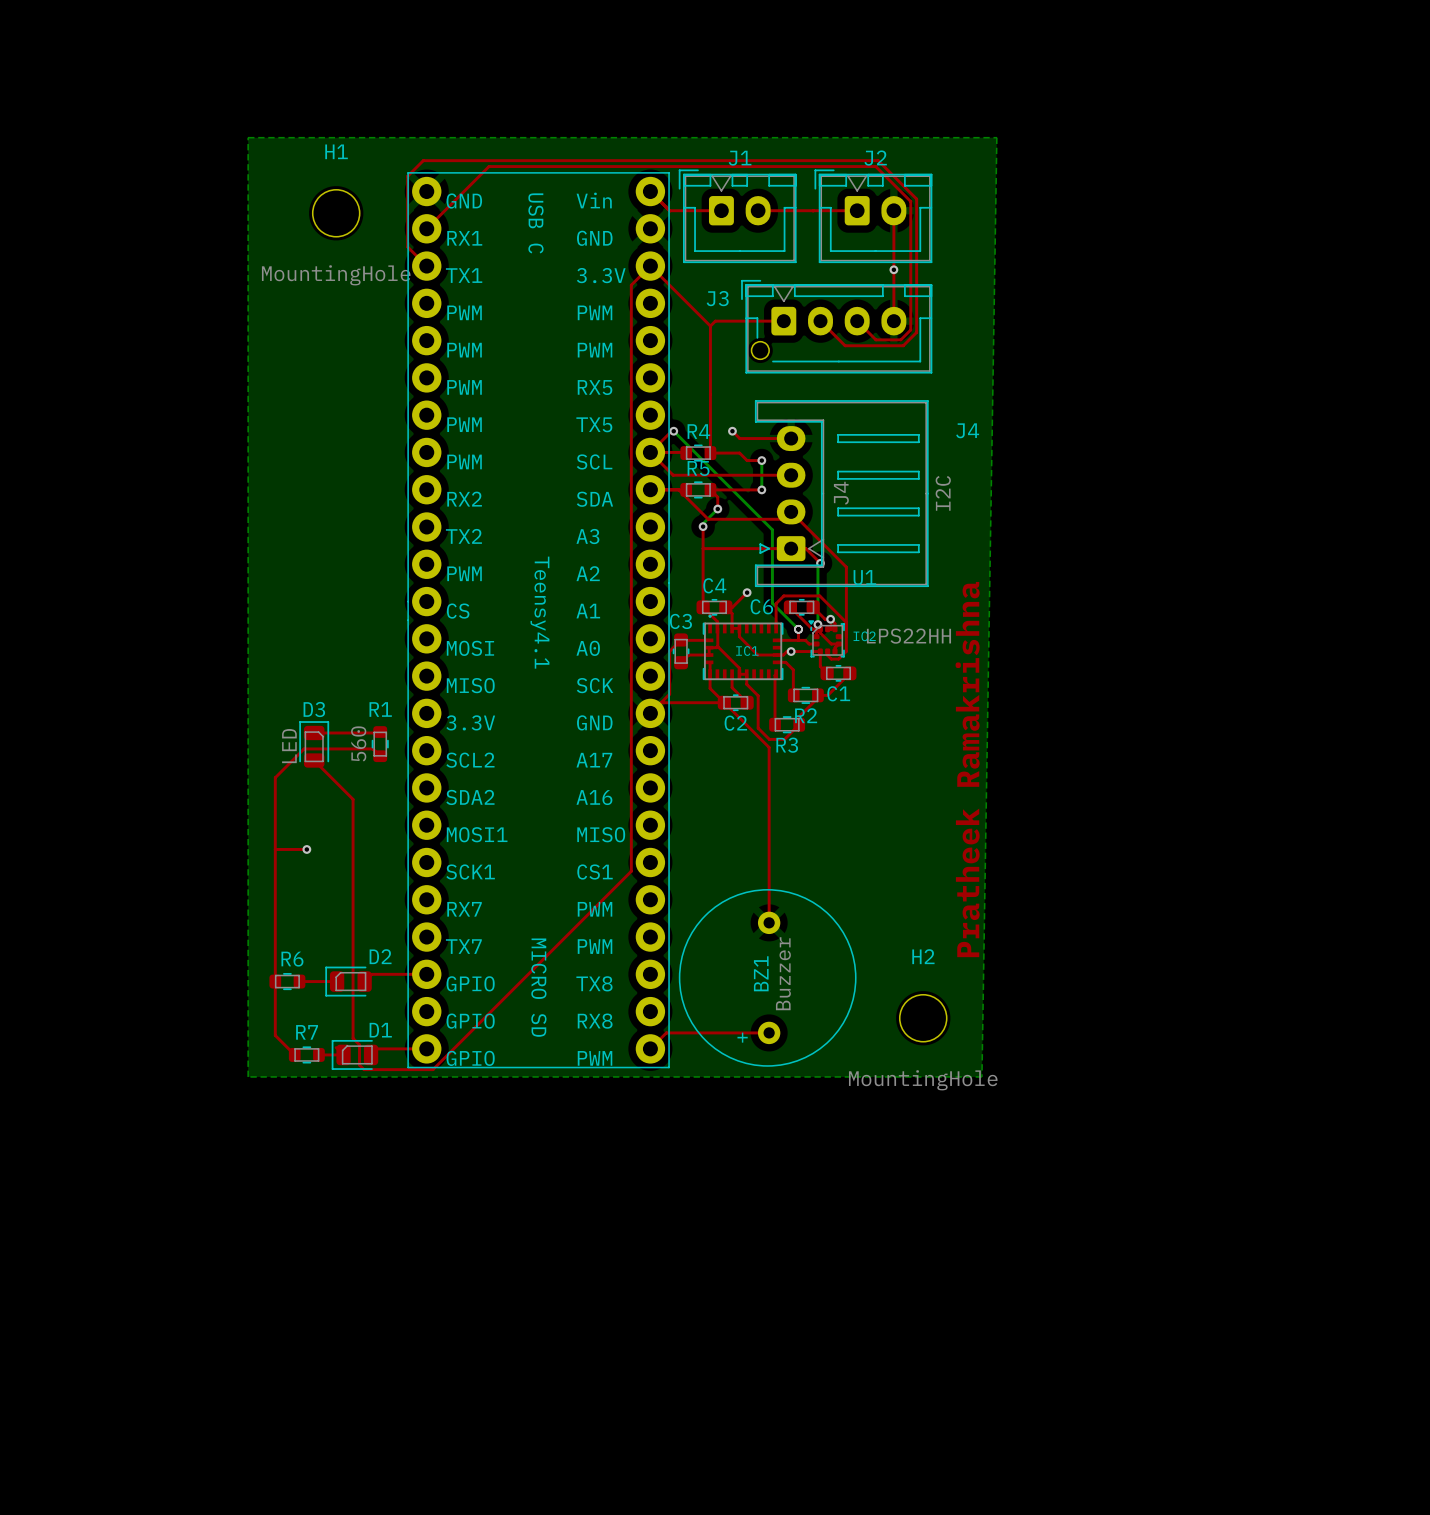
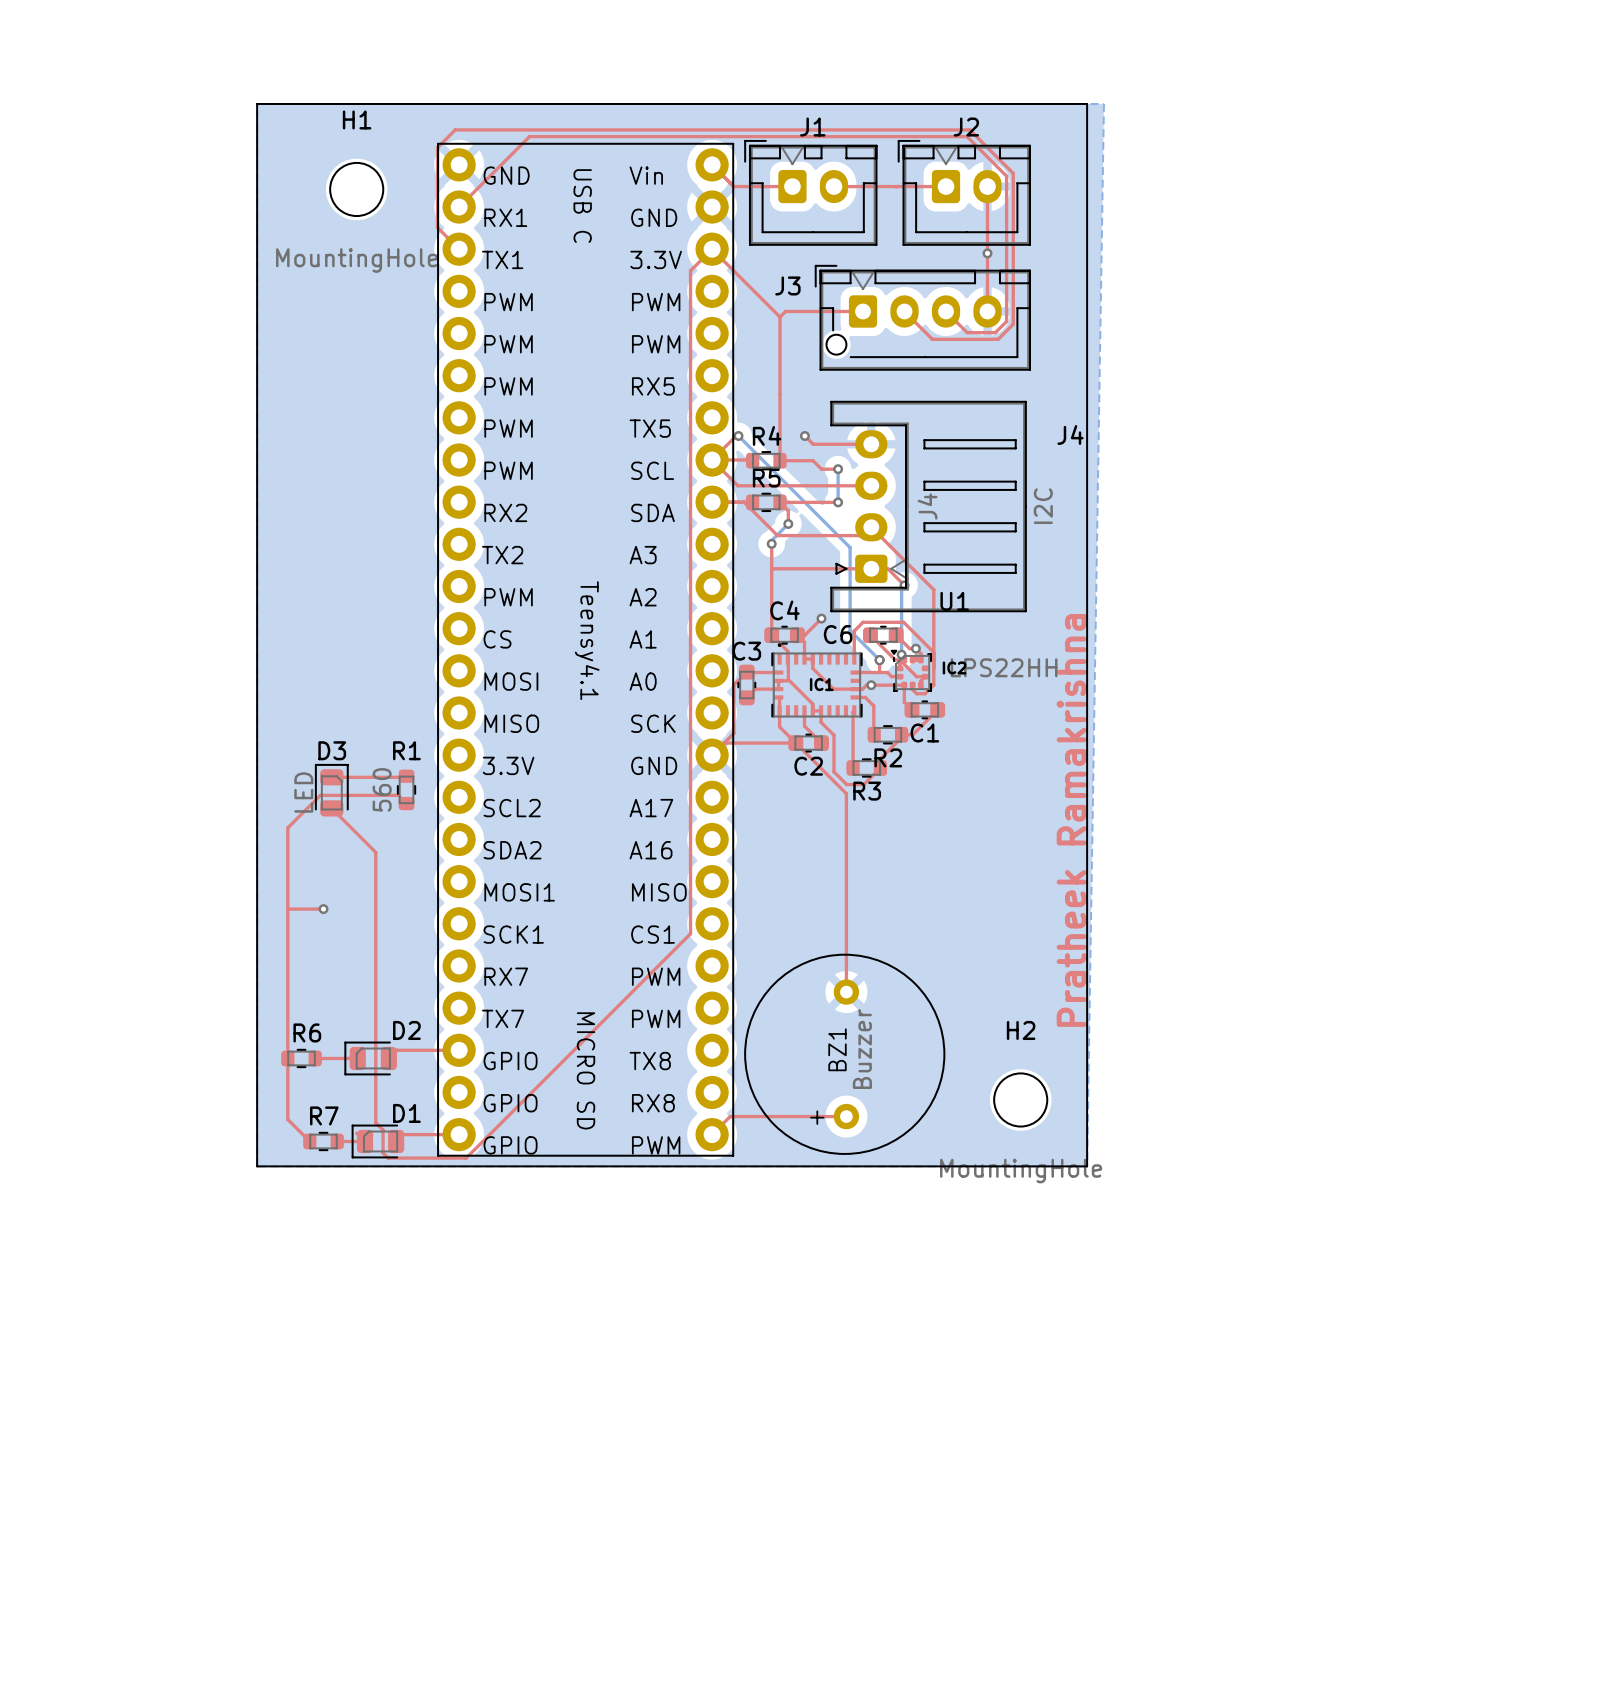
board edge: none -> (257, 103) (1087, 103) (1087, 1166) (257, 1166) (257, 103)

